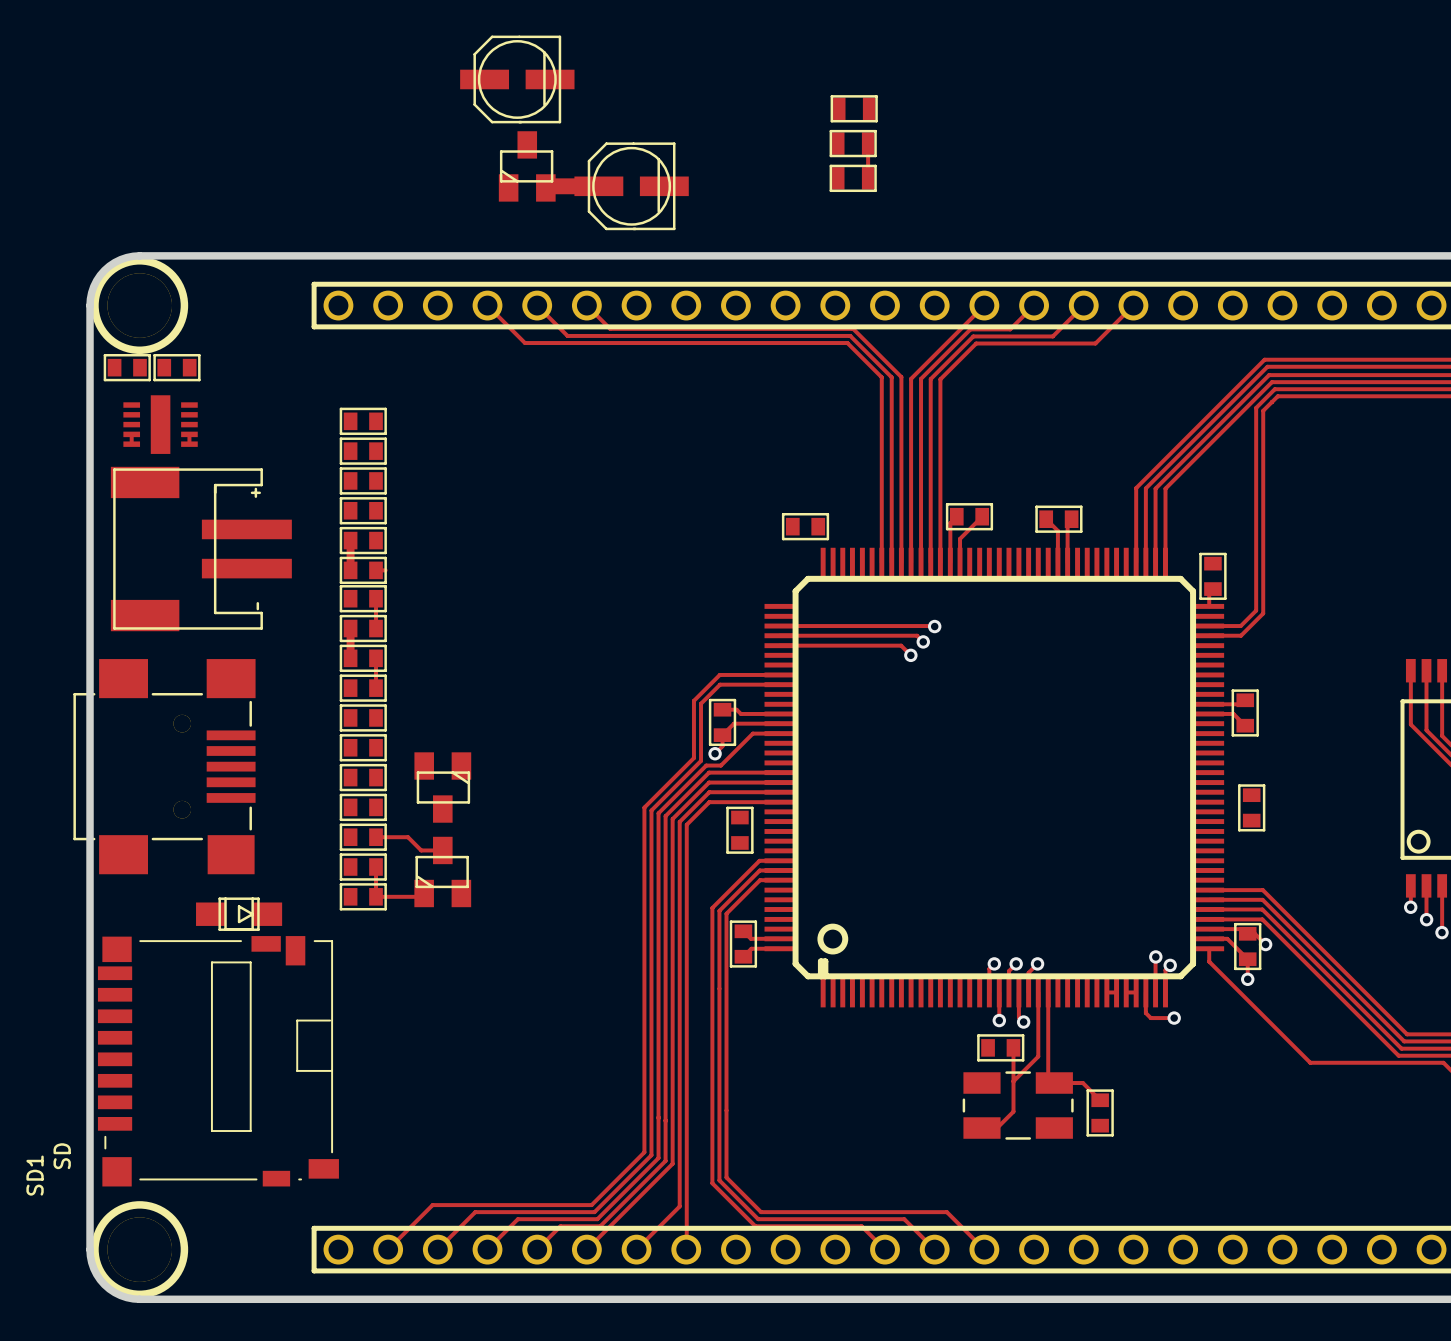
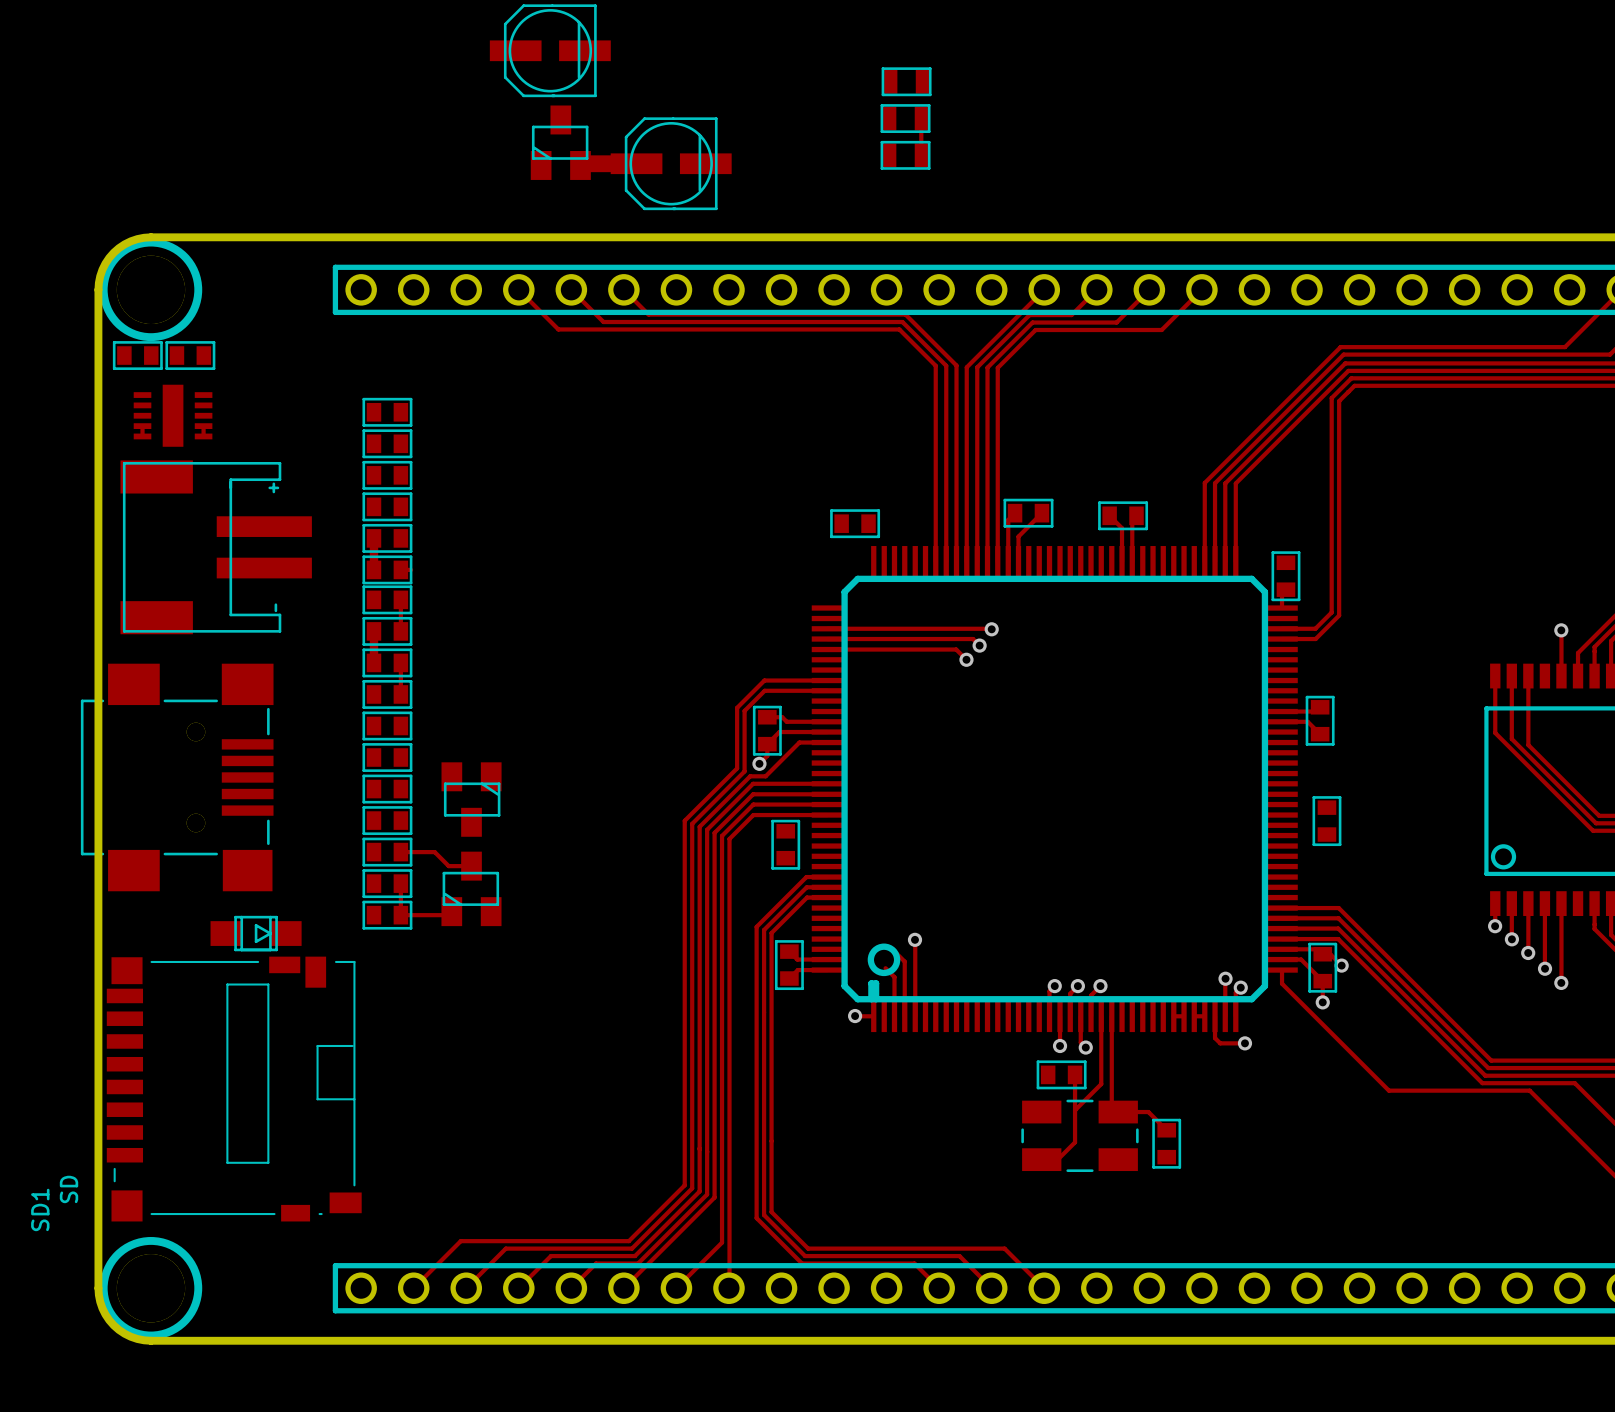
track: none -> (915, 940) (915, 1016)
via: none -> (915, 939)
track: none -> (897, 954) (904, 961) (904, 1016)
track: none -> (885, 968) (894, 977) (894, 1016)
track: none -> (855, 1016) (873, 1016)
via: none -> (855, 1016)

